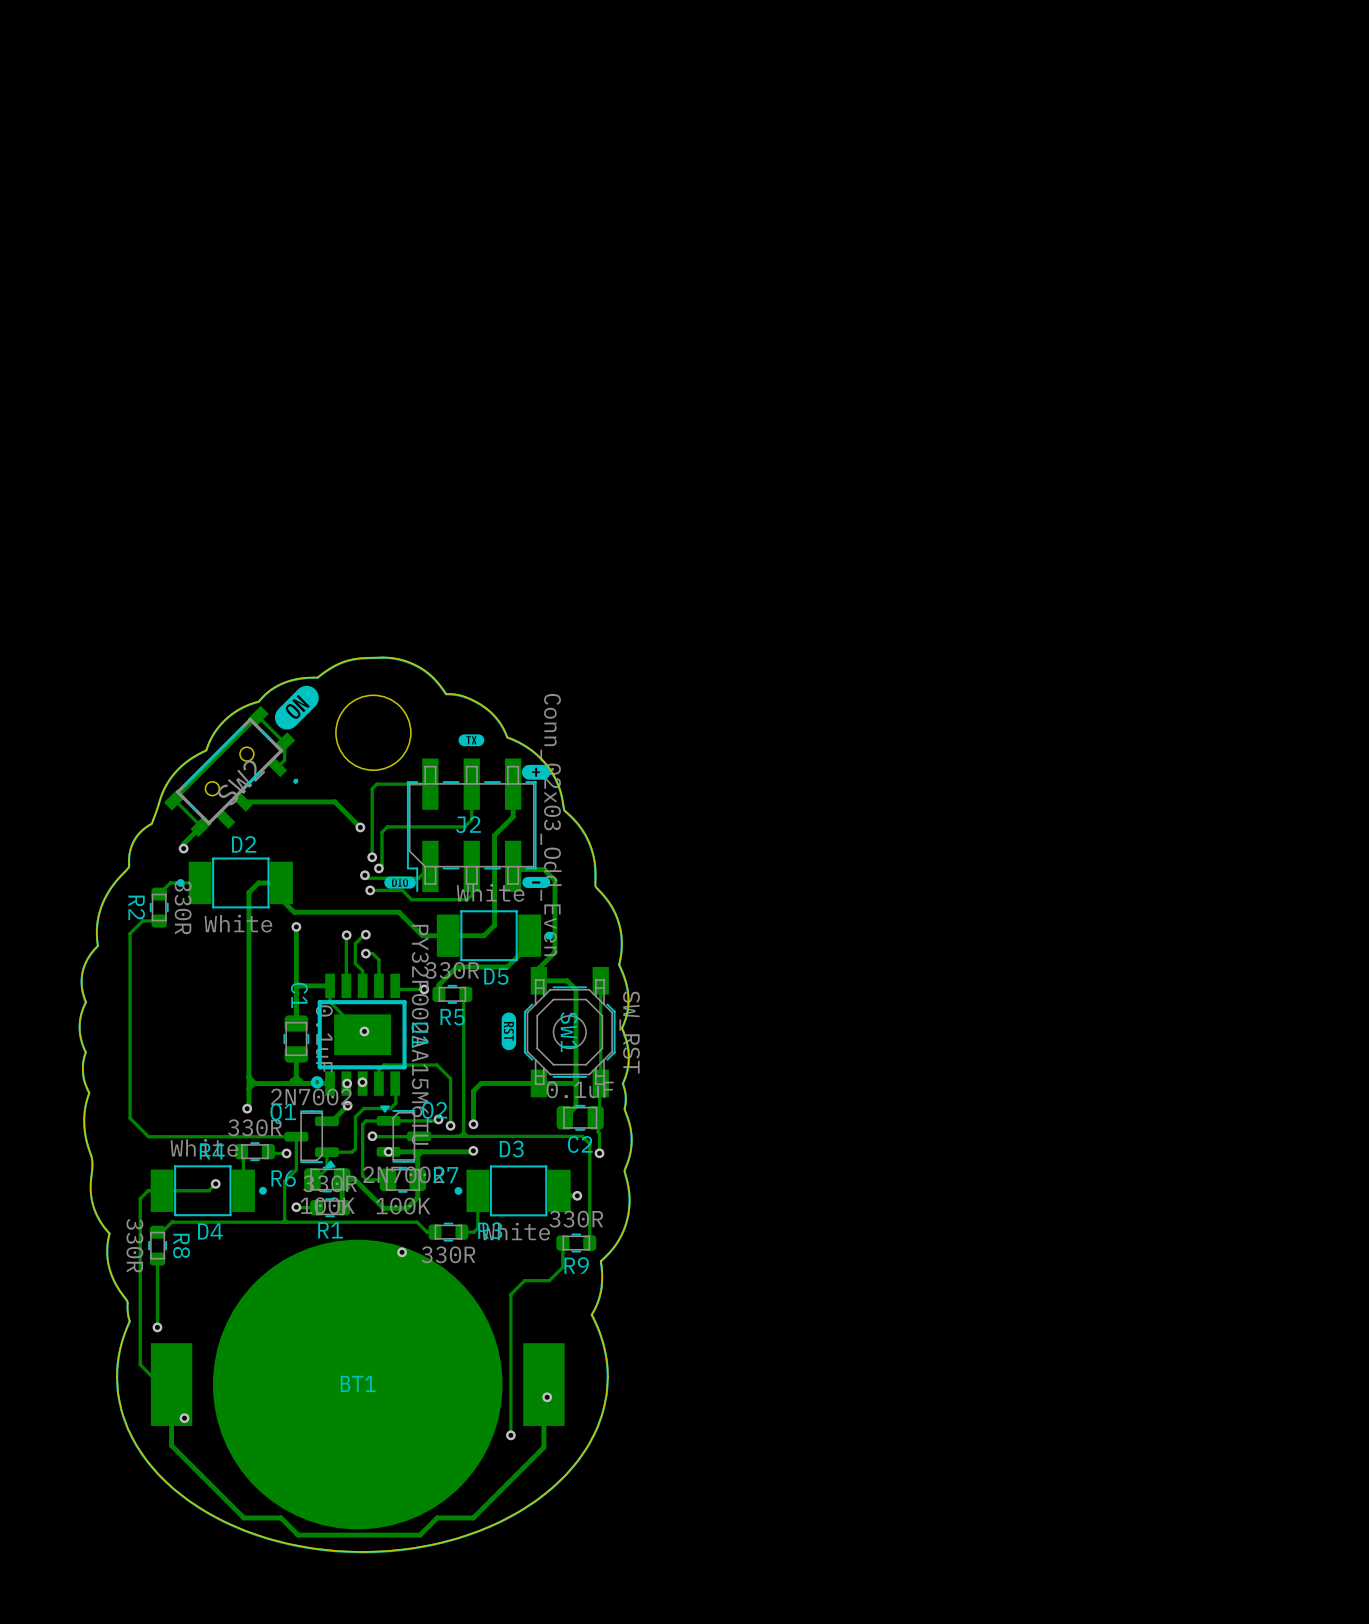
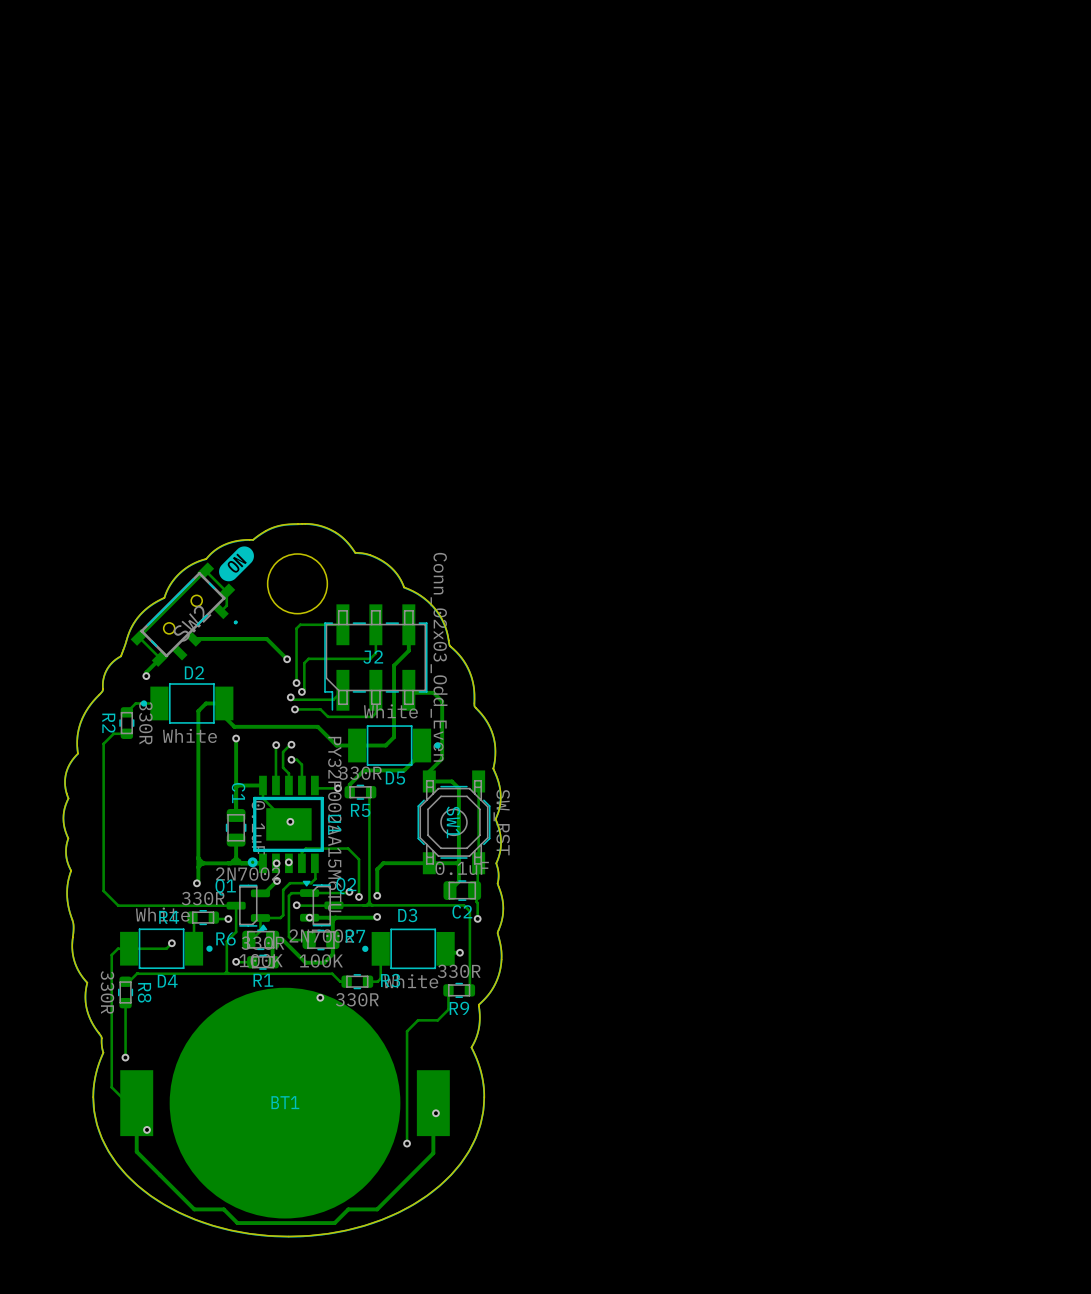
drawing: [458, 734, 485, 747] -> none
drawing: [521, 764, 551, 780] -> none
drawing: [384, 876, 416, 889] -> none
drawing: [522, 876, 551, 889] -> none
drawing: [501, 1012, 517, 1051] -> none

